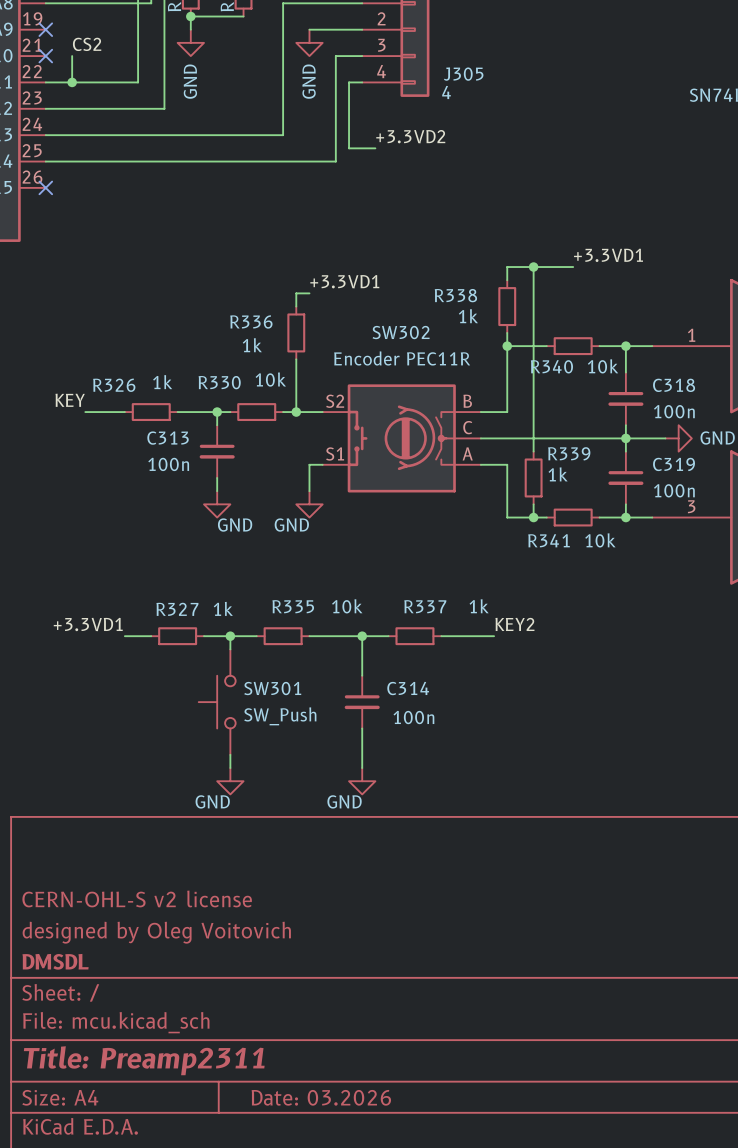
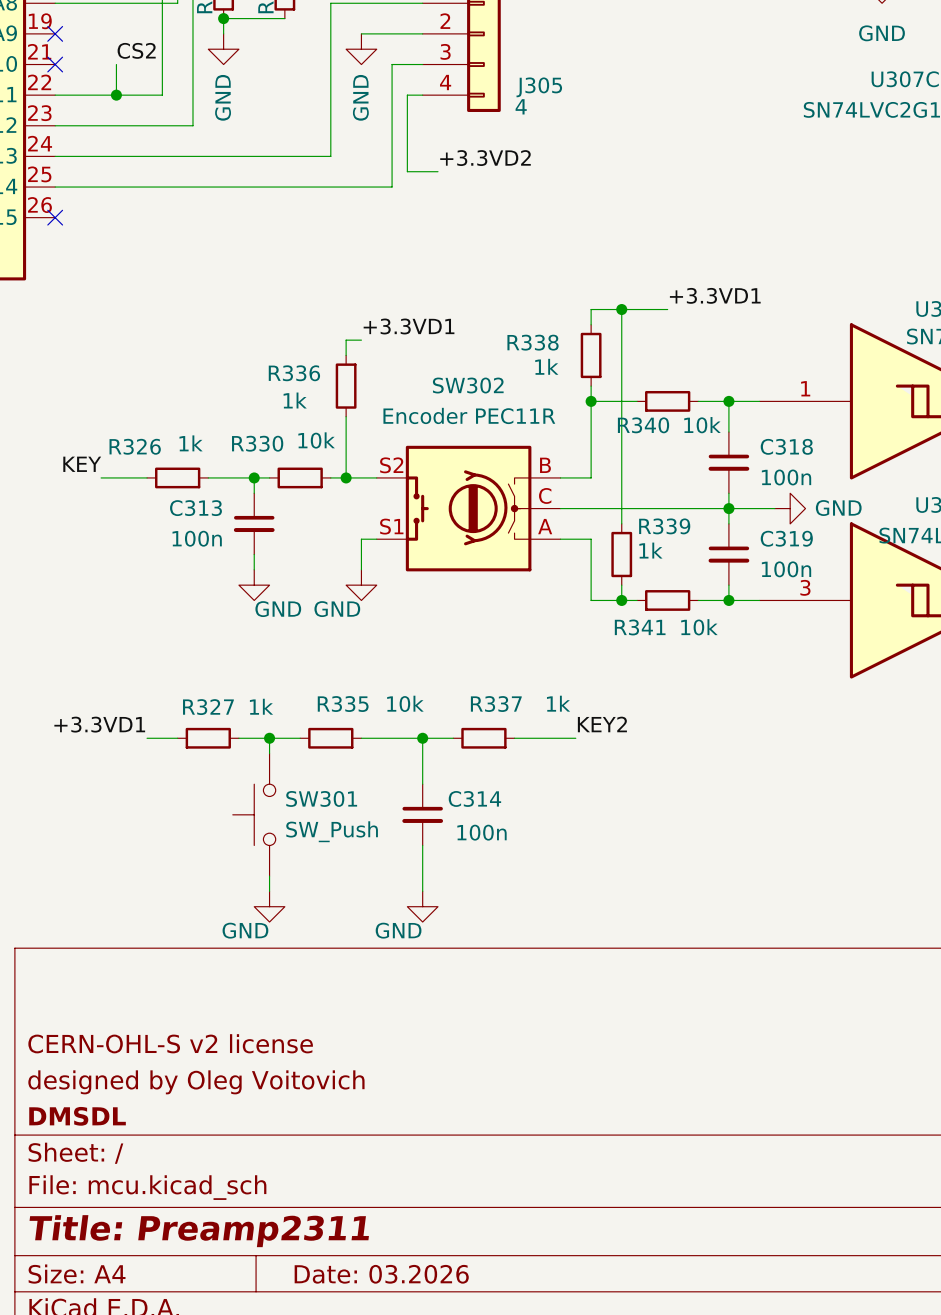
label position: CS2 (87, 44) -> CS2 (136, 50)
wire: (72, 56) (72, 82) -> (116, 64) (116, 95)
junction position: (72, 82) -> (116, 95)

